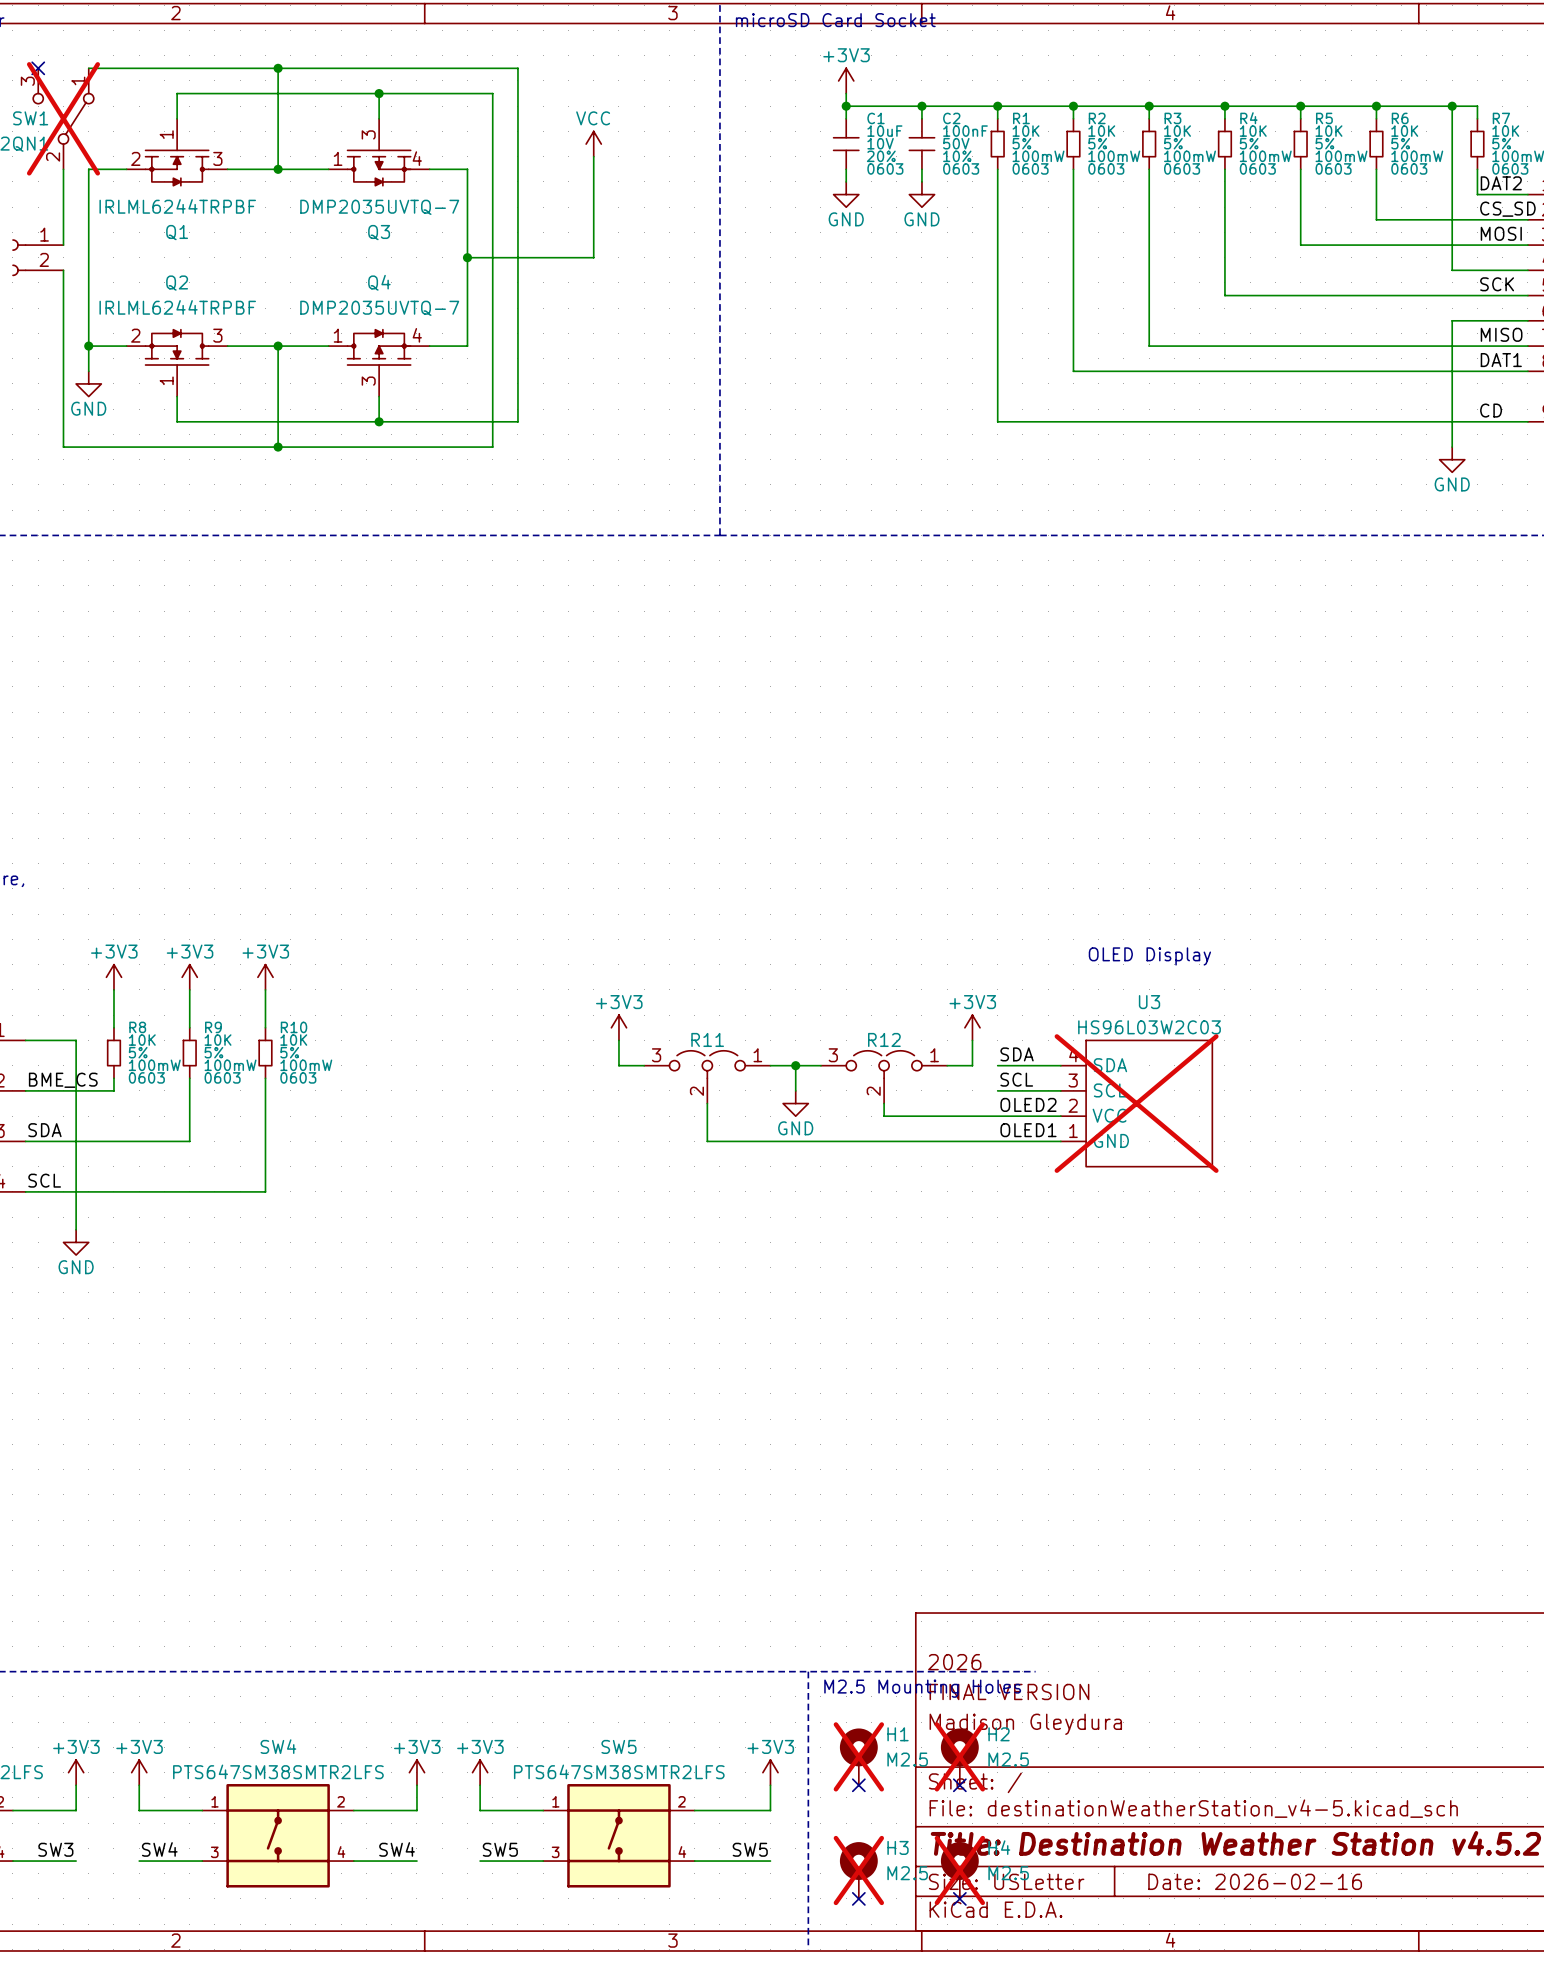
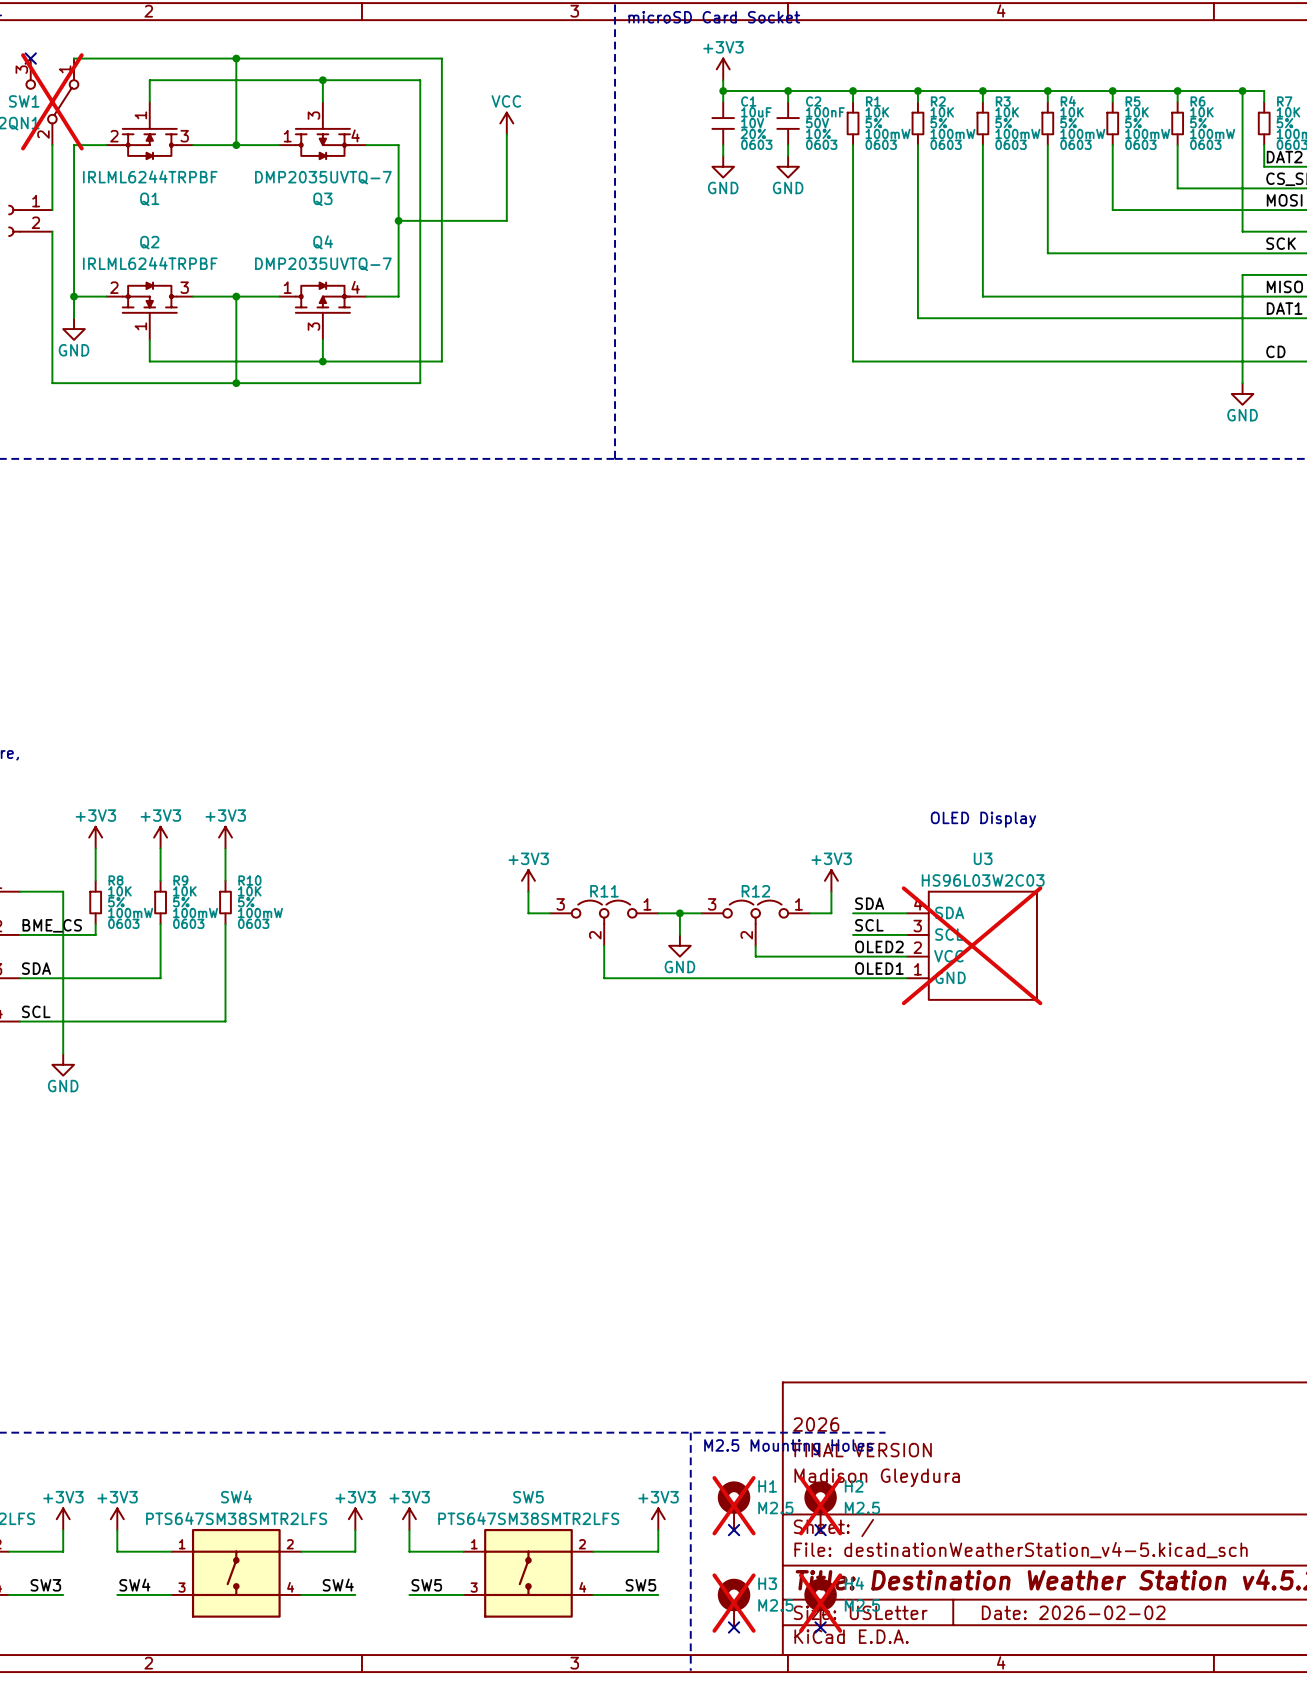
title block: Date: 2026-02-16 (1255, 1881) -> Date: 2026-02-02 (1073, 1612)

